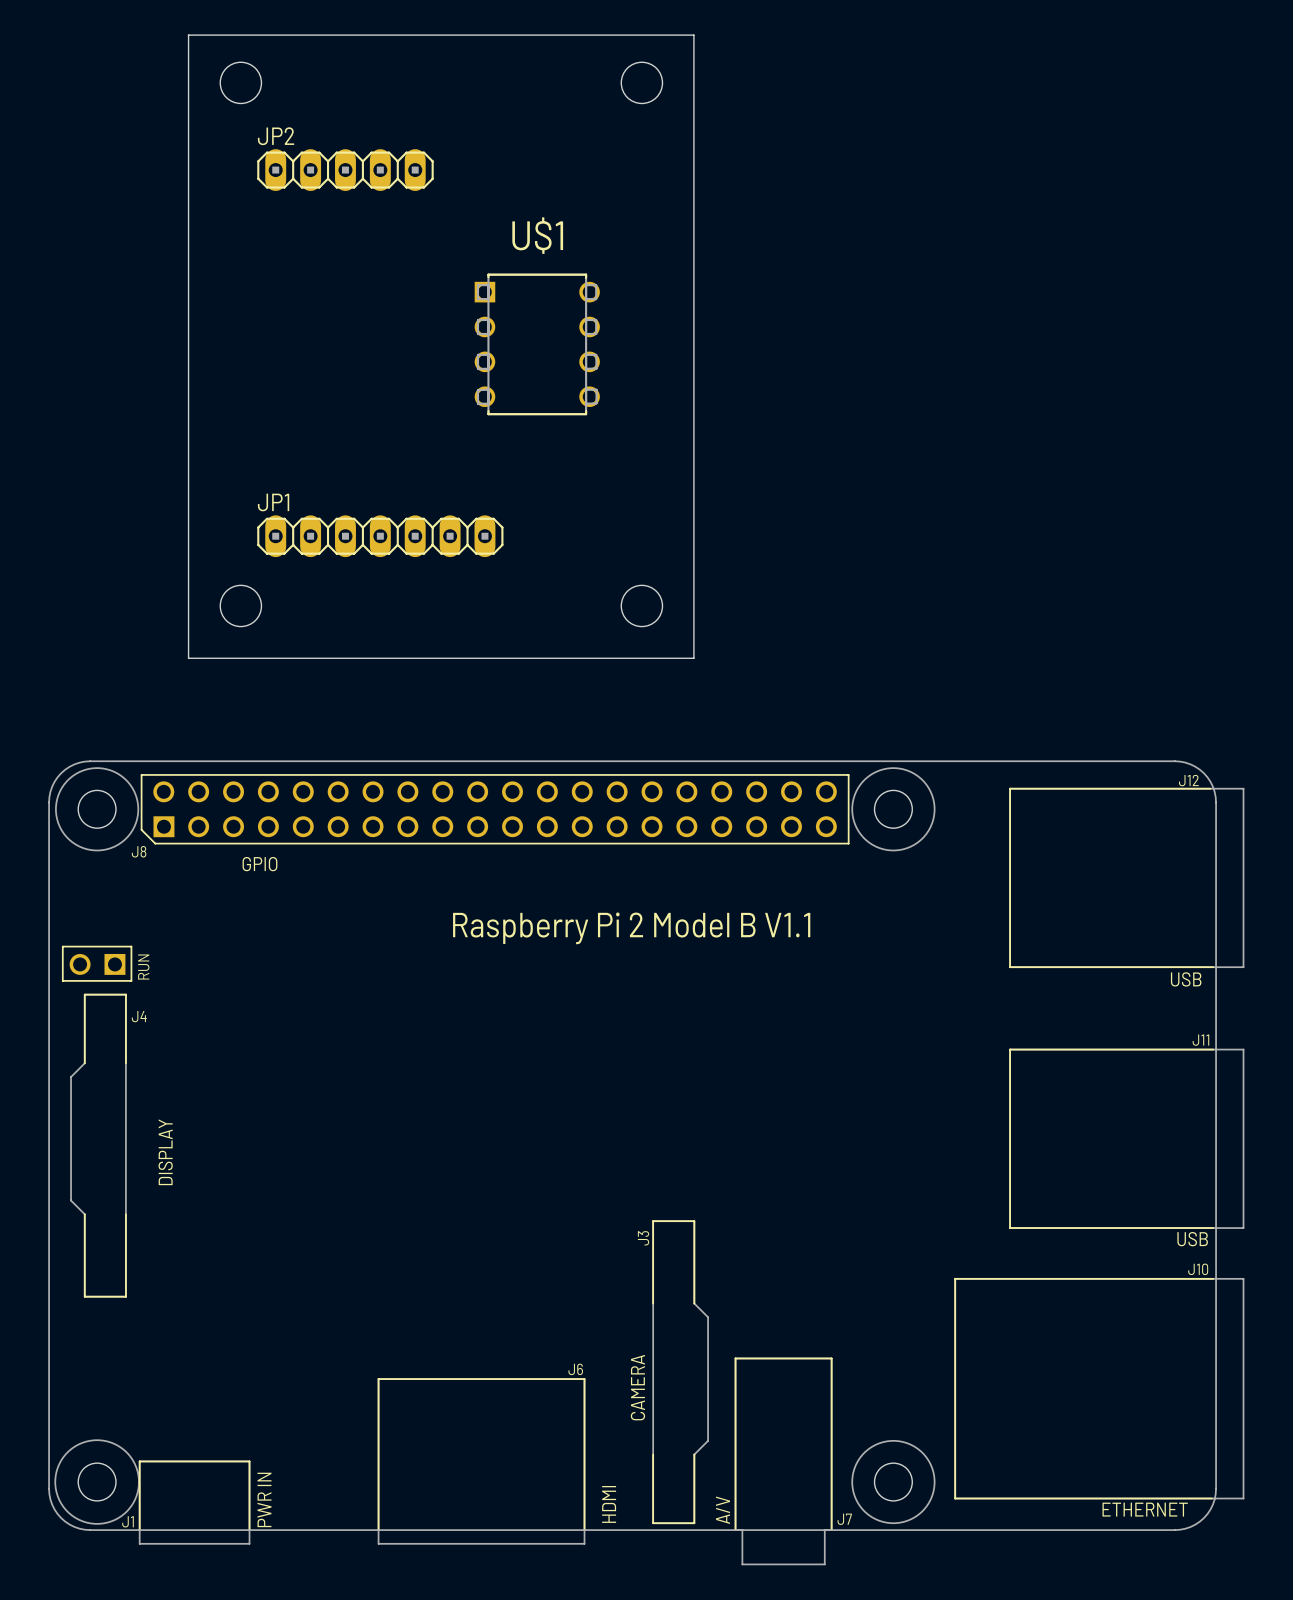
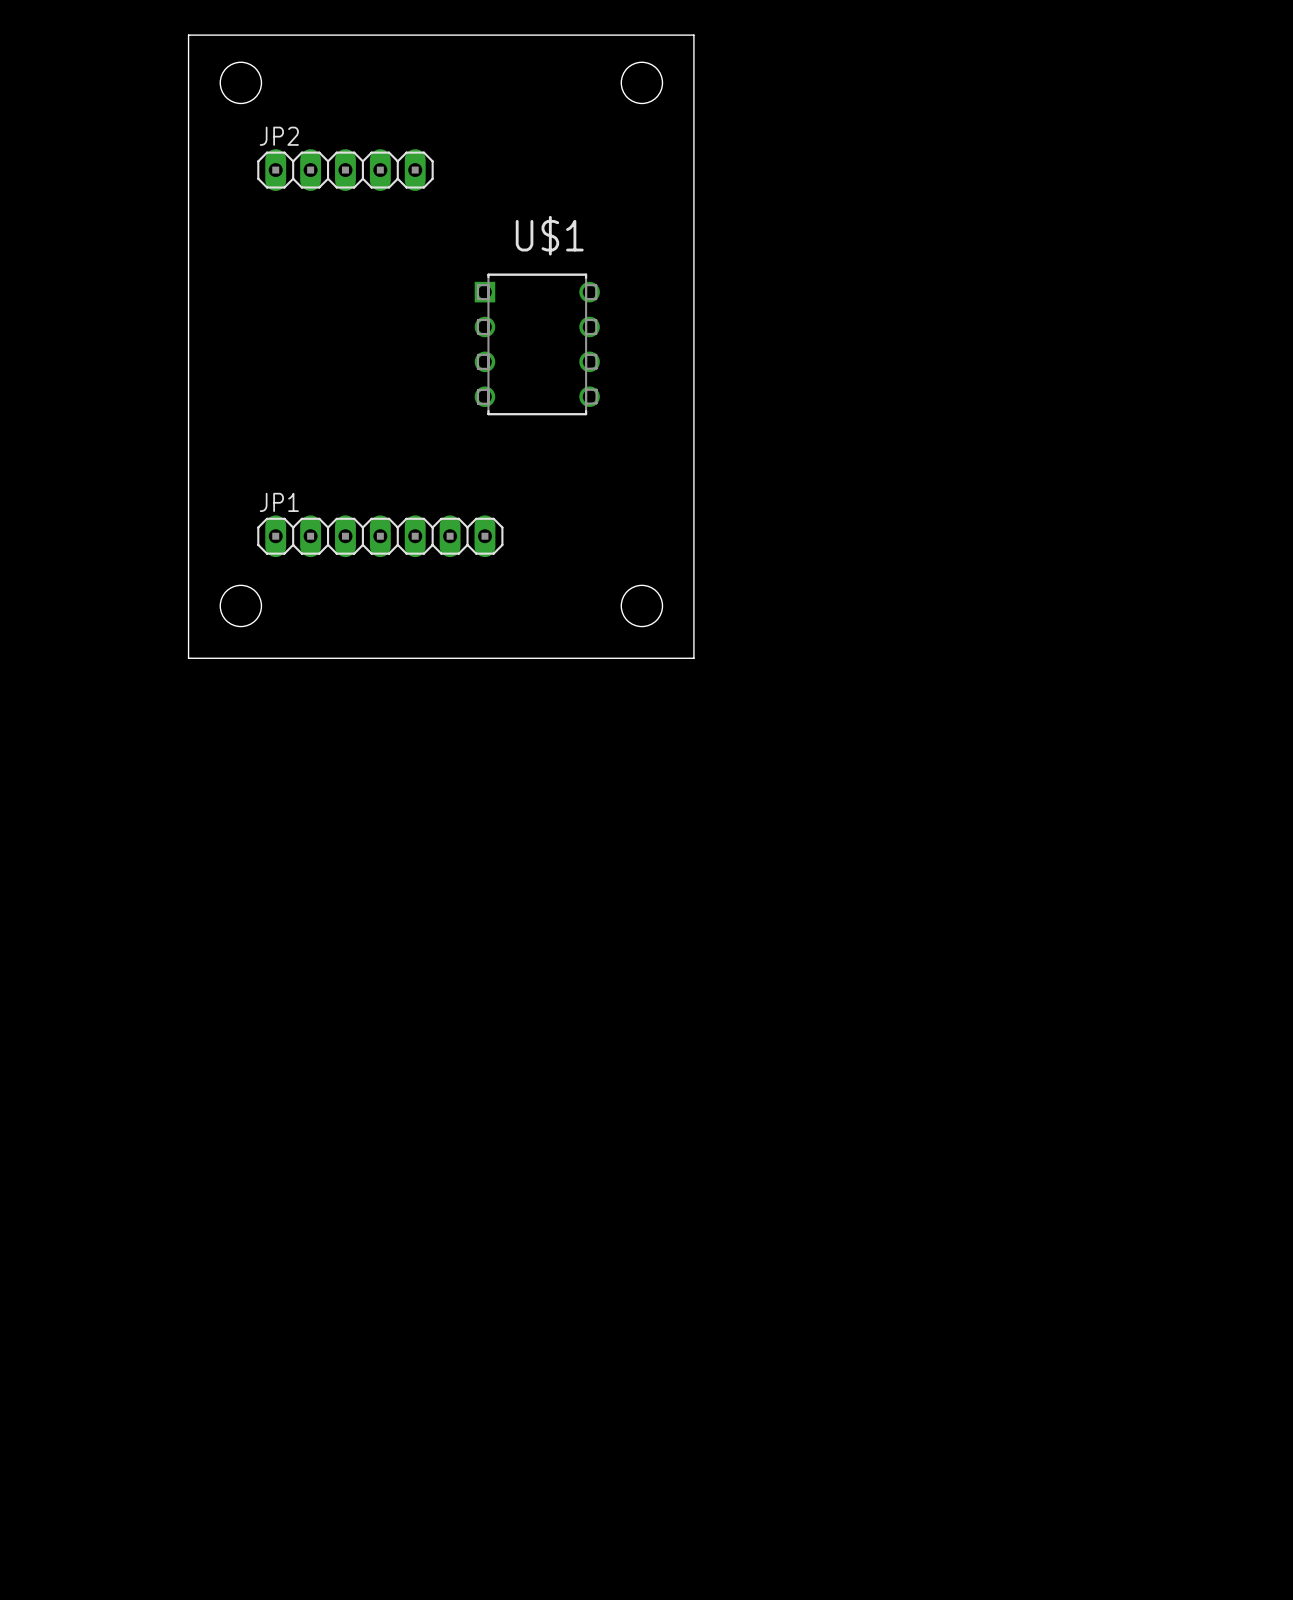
part: (646, 1162) -> none

